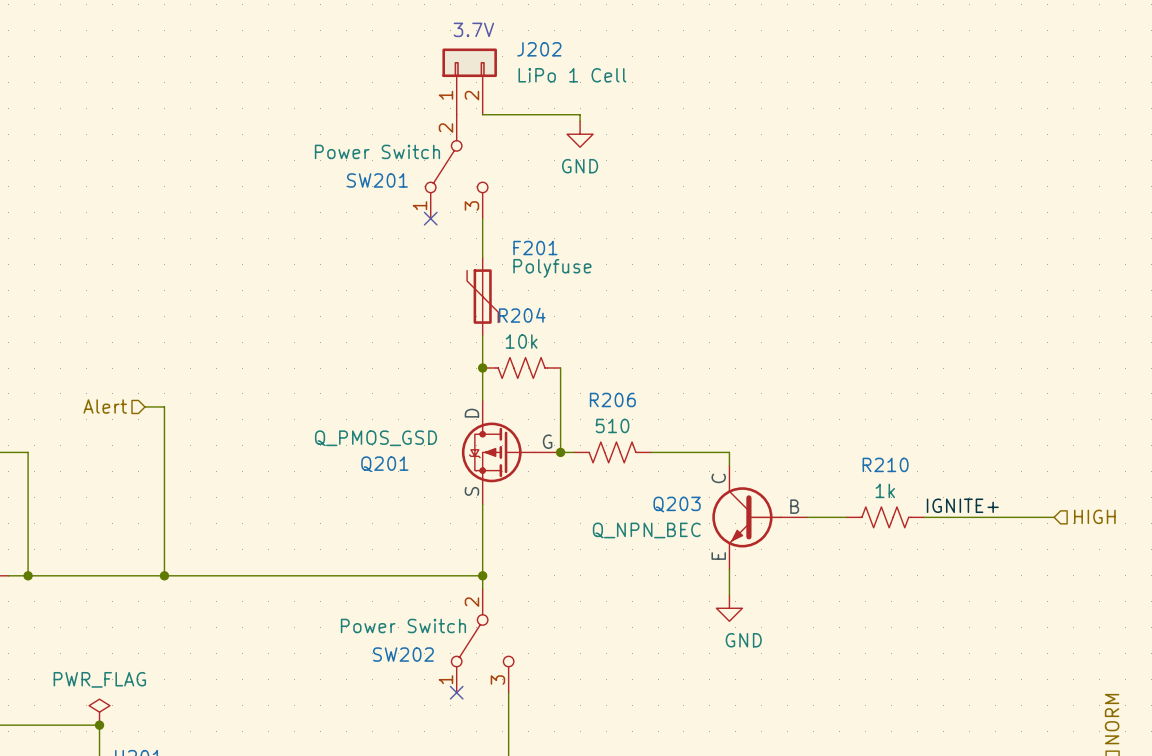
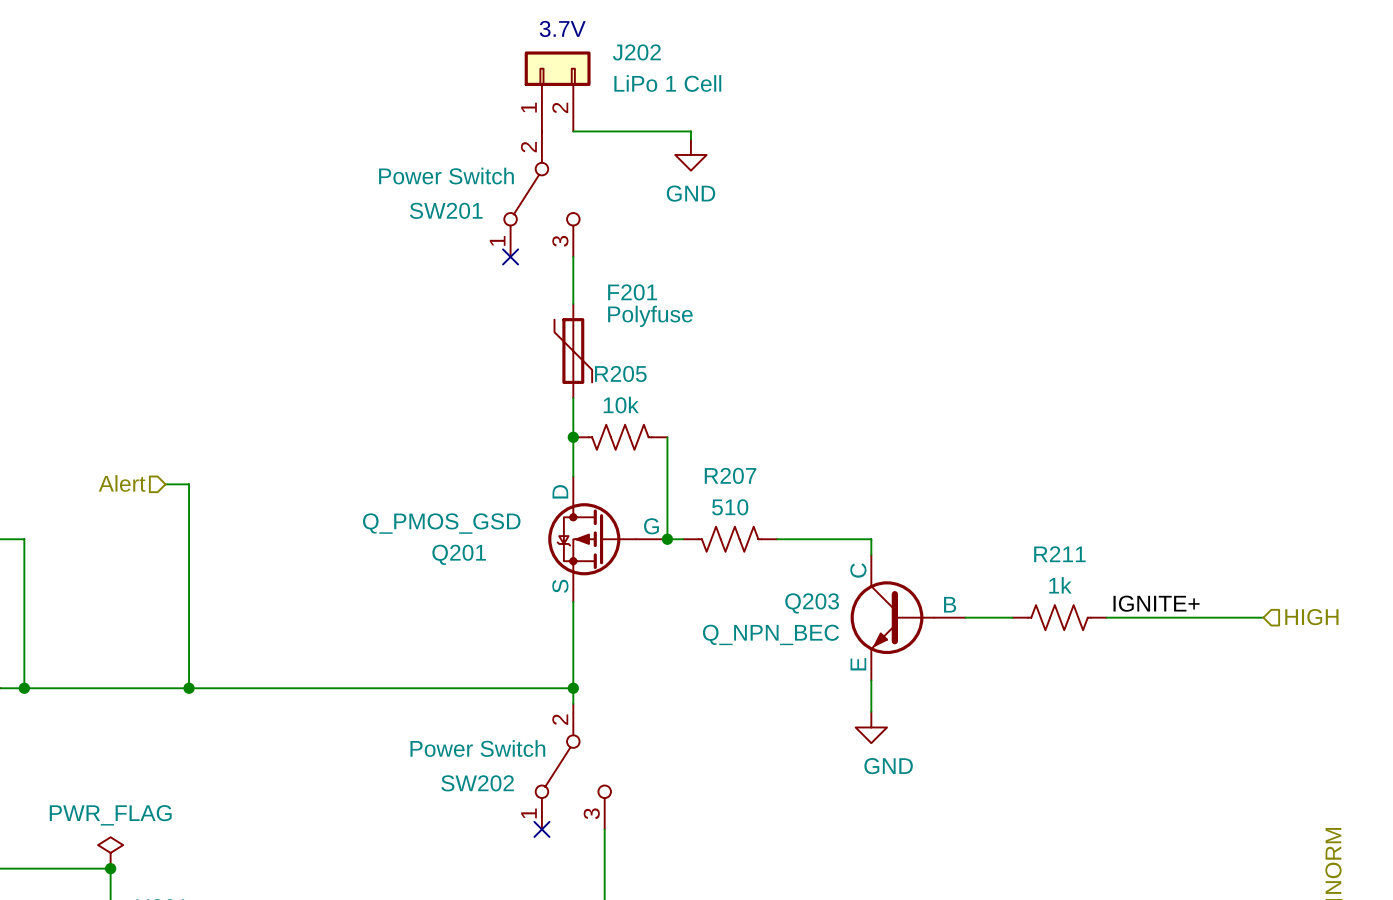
R204 name: R204 (522, 315) -> R205 (620, 373)
R206 name: R206 (612, 399) -> R207 (730, 475)
R210 name: R210 (885, 464) -> R211 (1059, 554)

